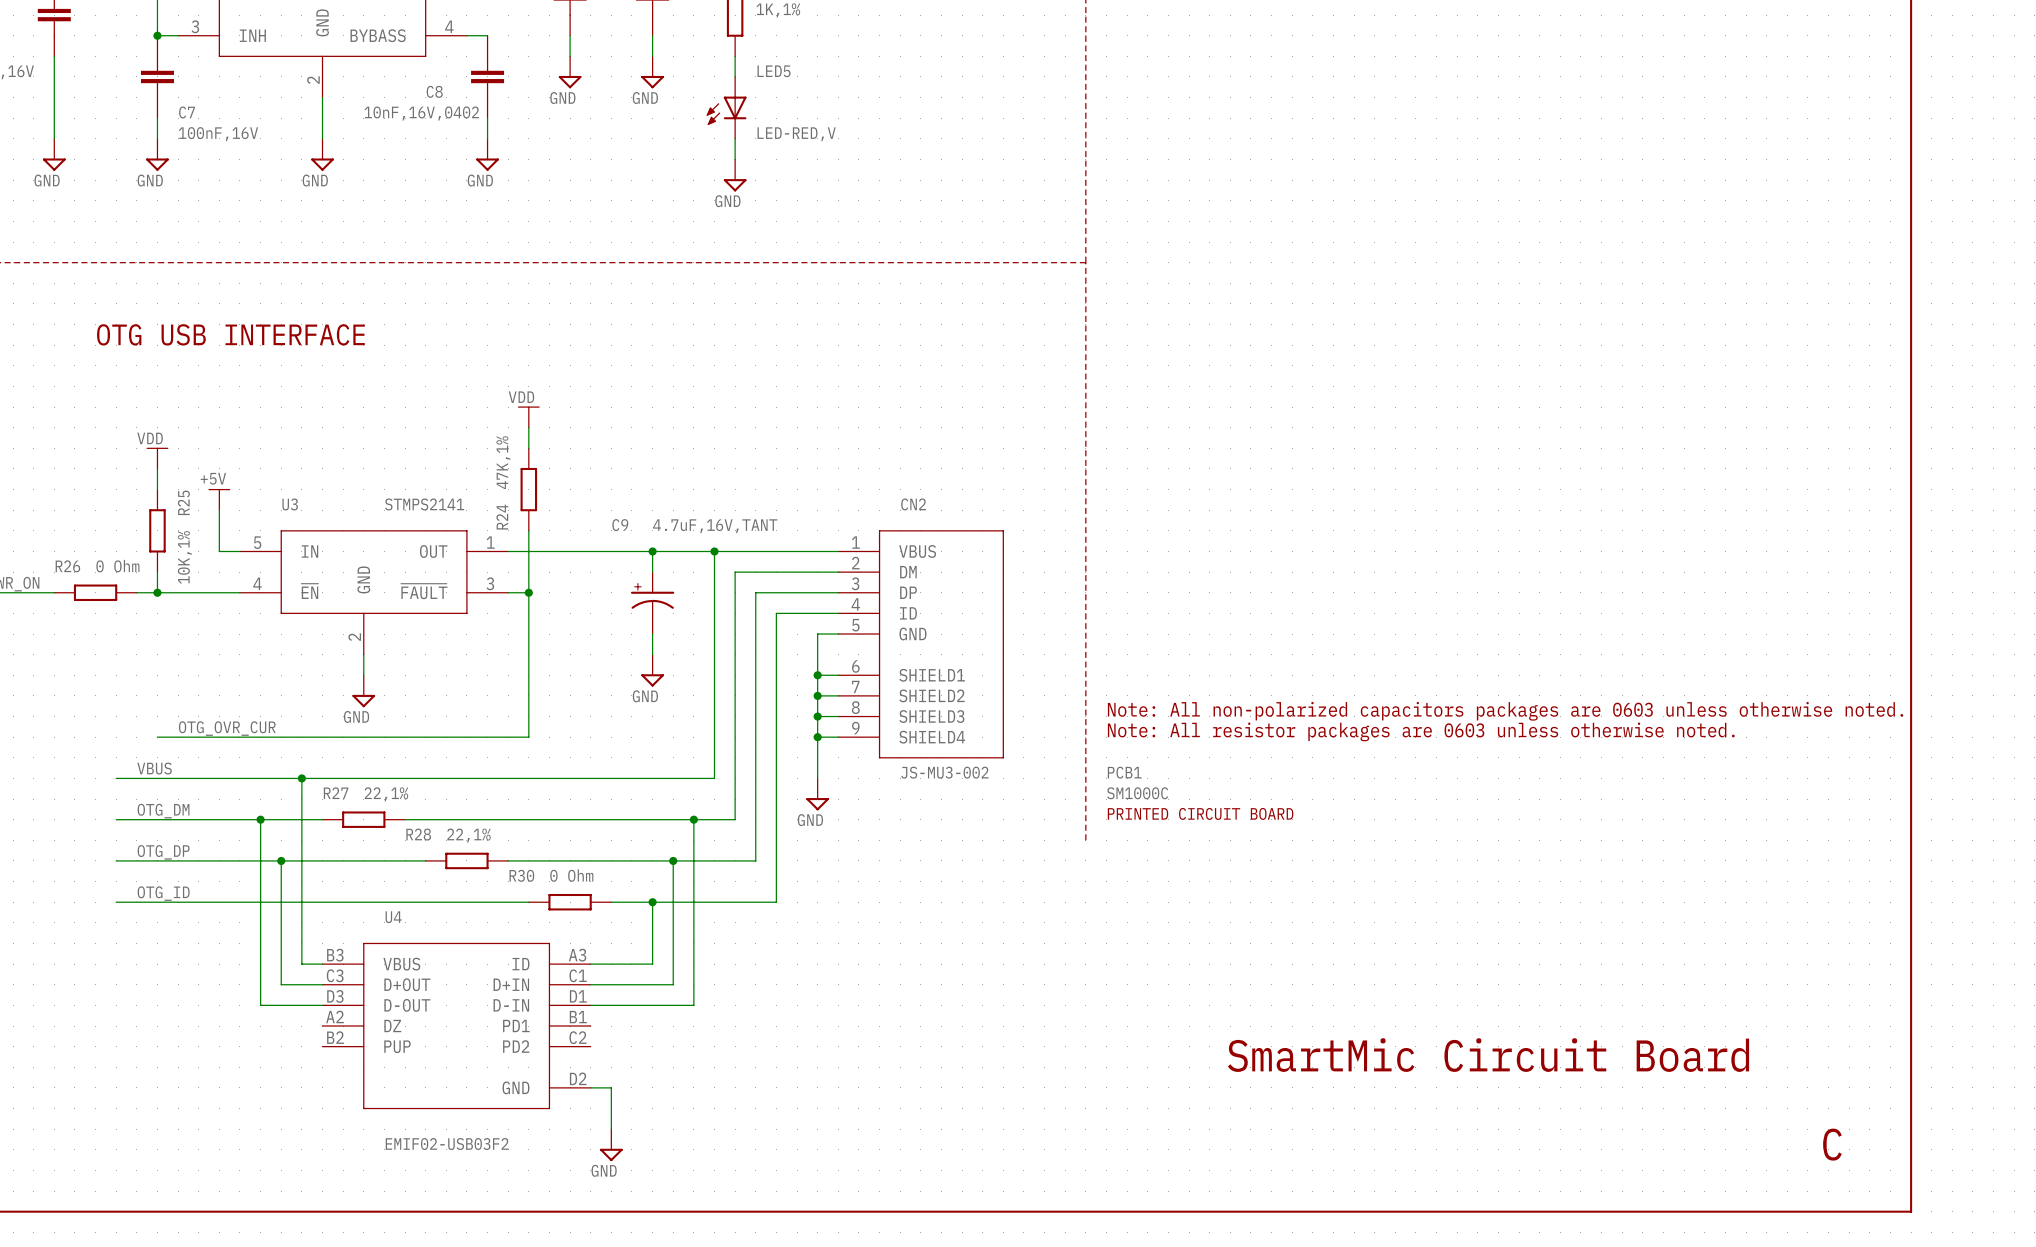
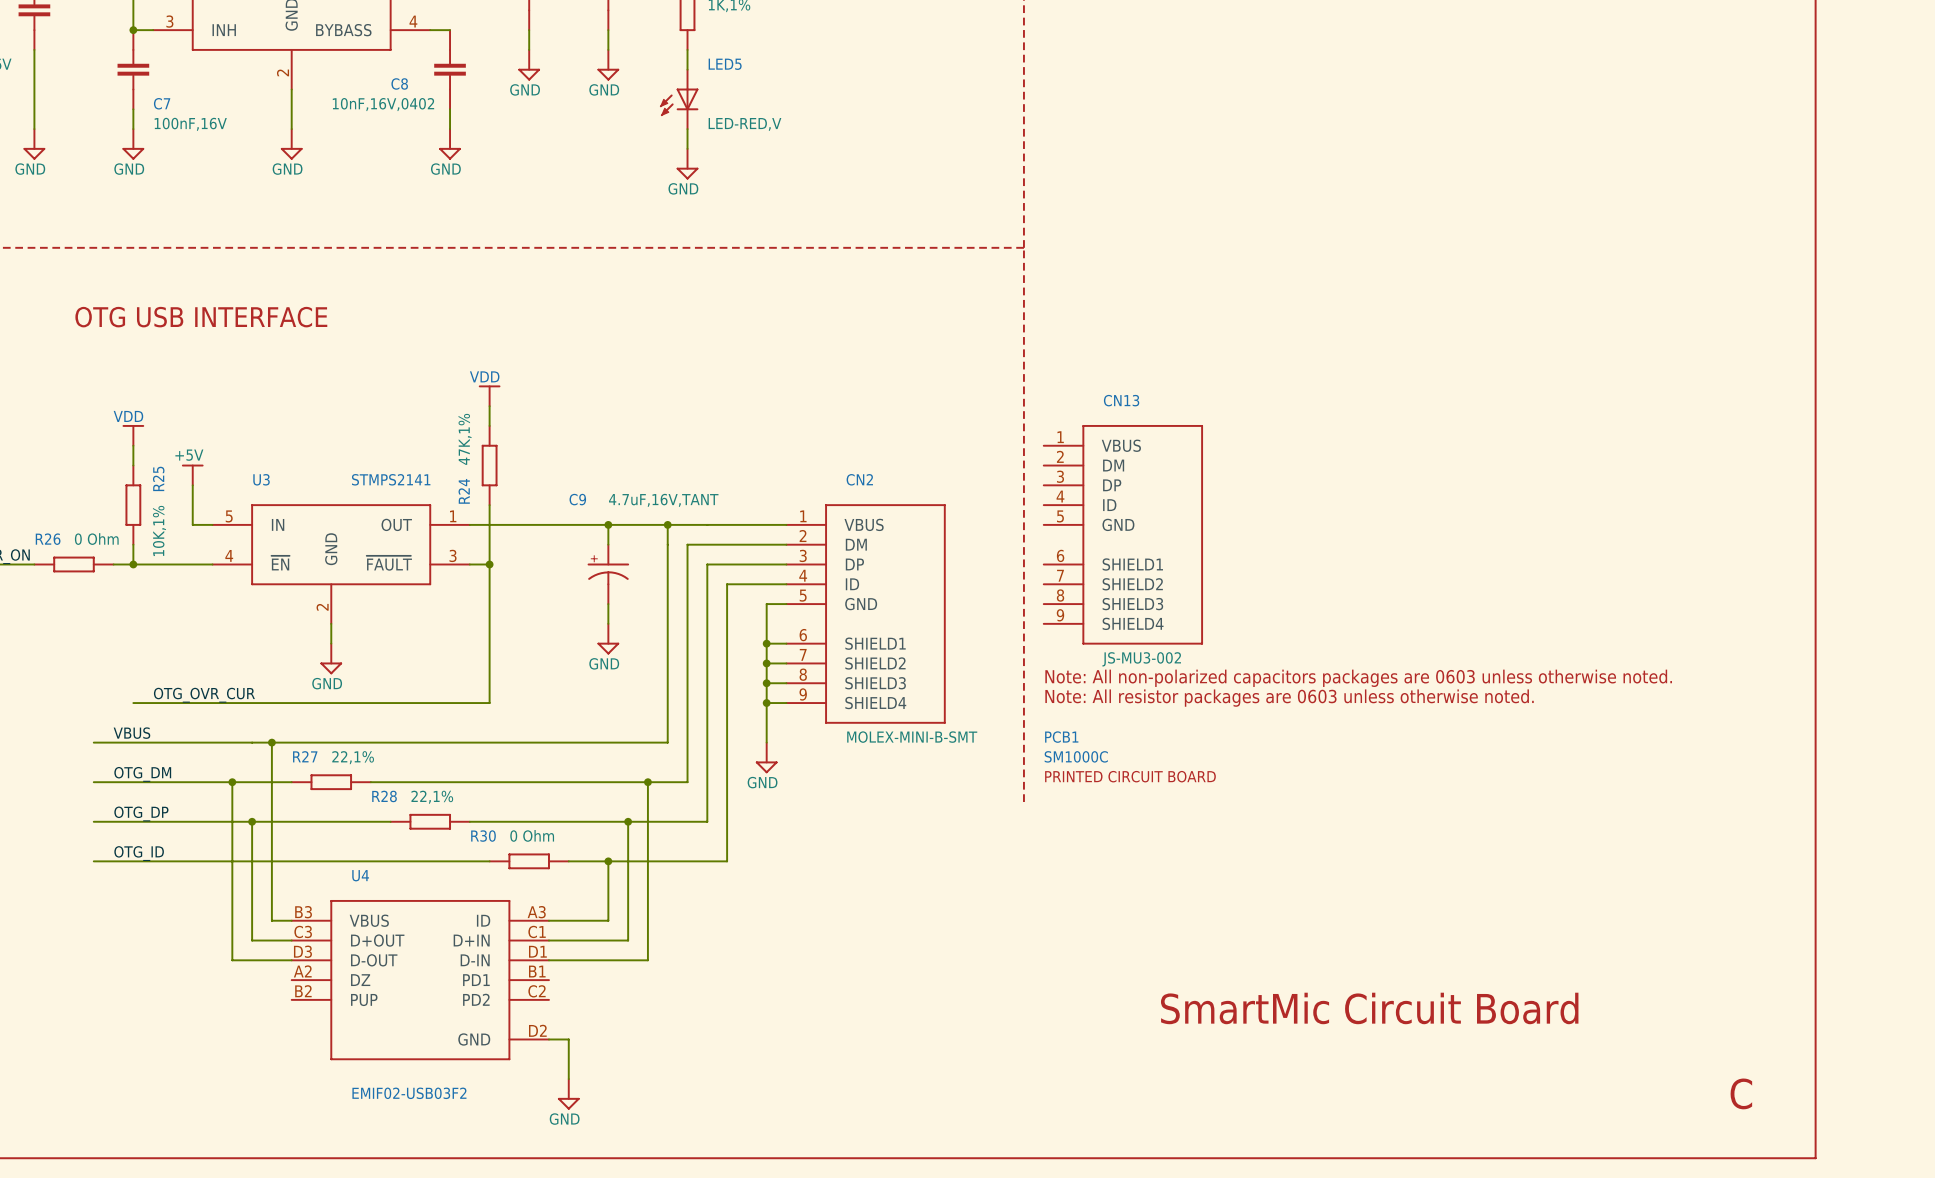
CN13: none -> JS-MU3-002 (1123, 534)
CN2 value: JS-MU3-002 (944, 772) -> MOLEX-MINI-B-SMT (912, 737)

